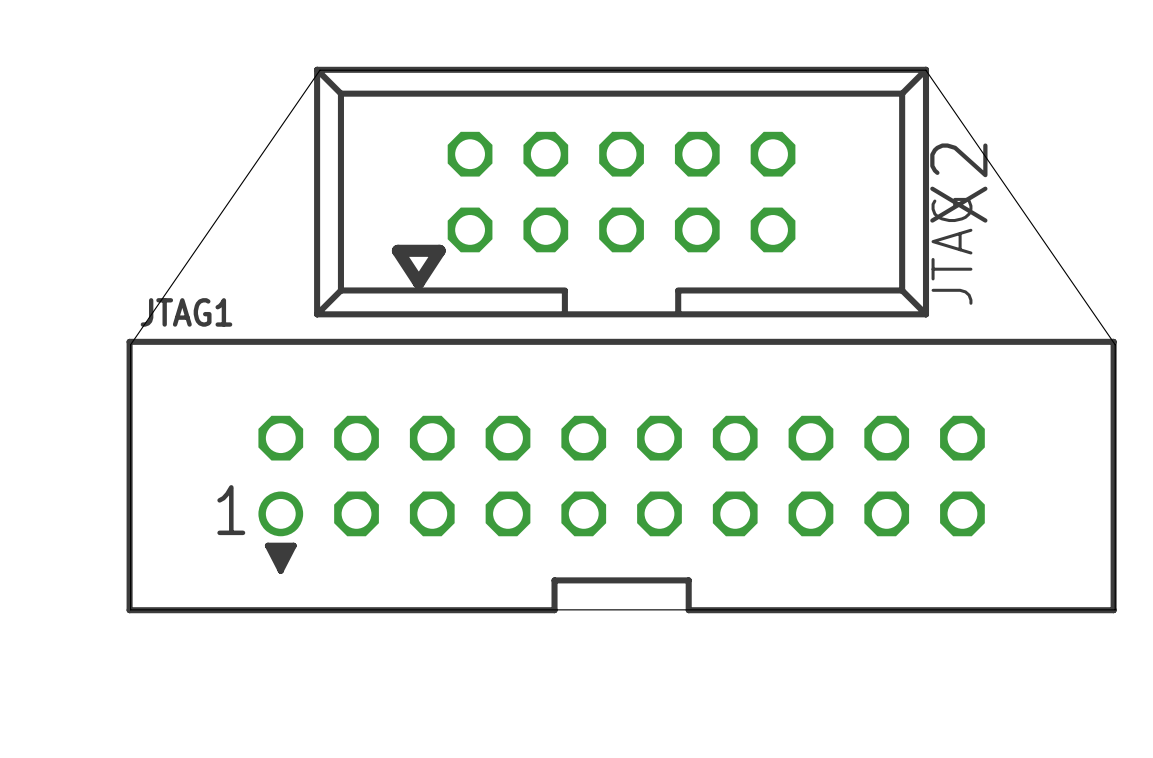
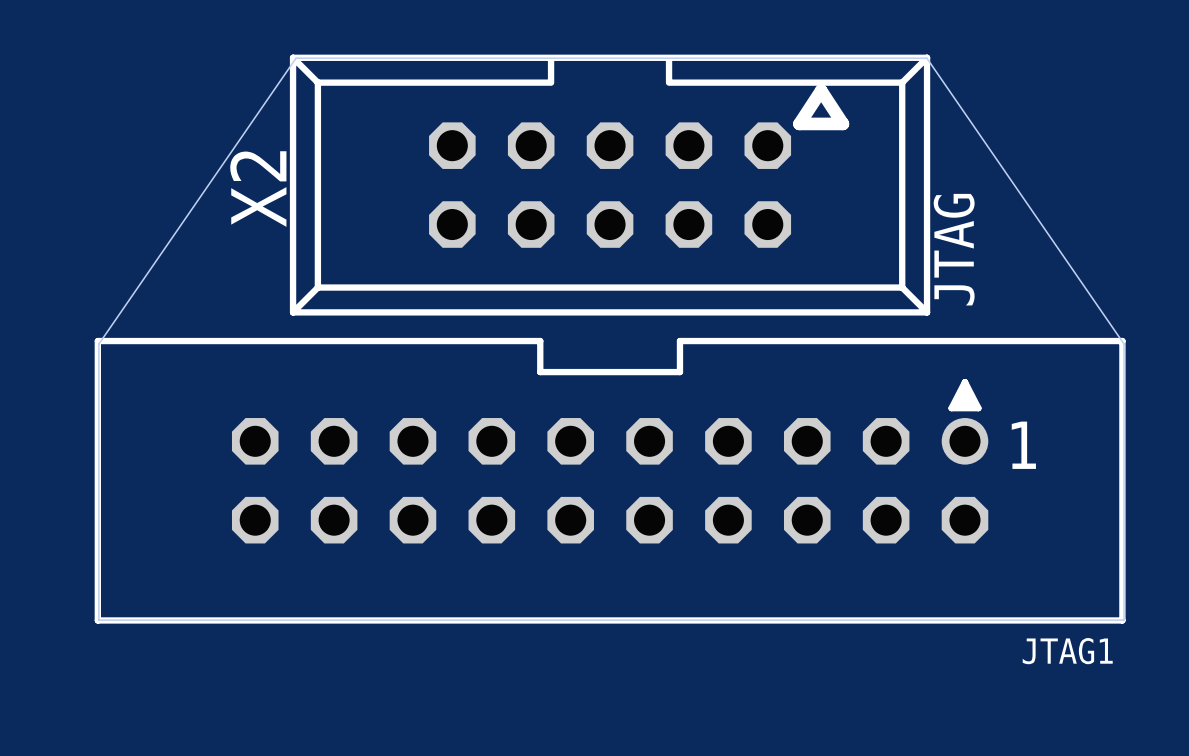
X2 rotation: 0° (621, 192) -> 180° (610, 185)
JTAG1 name position: JTAG1 (186, 312) -> JTAG1 (1067, 651)
JTAG1 footprint: [126, 338, 1117, 614] -> [94, 337, 1126, 624]

